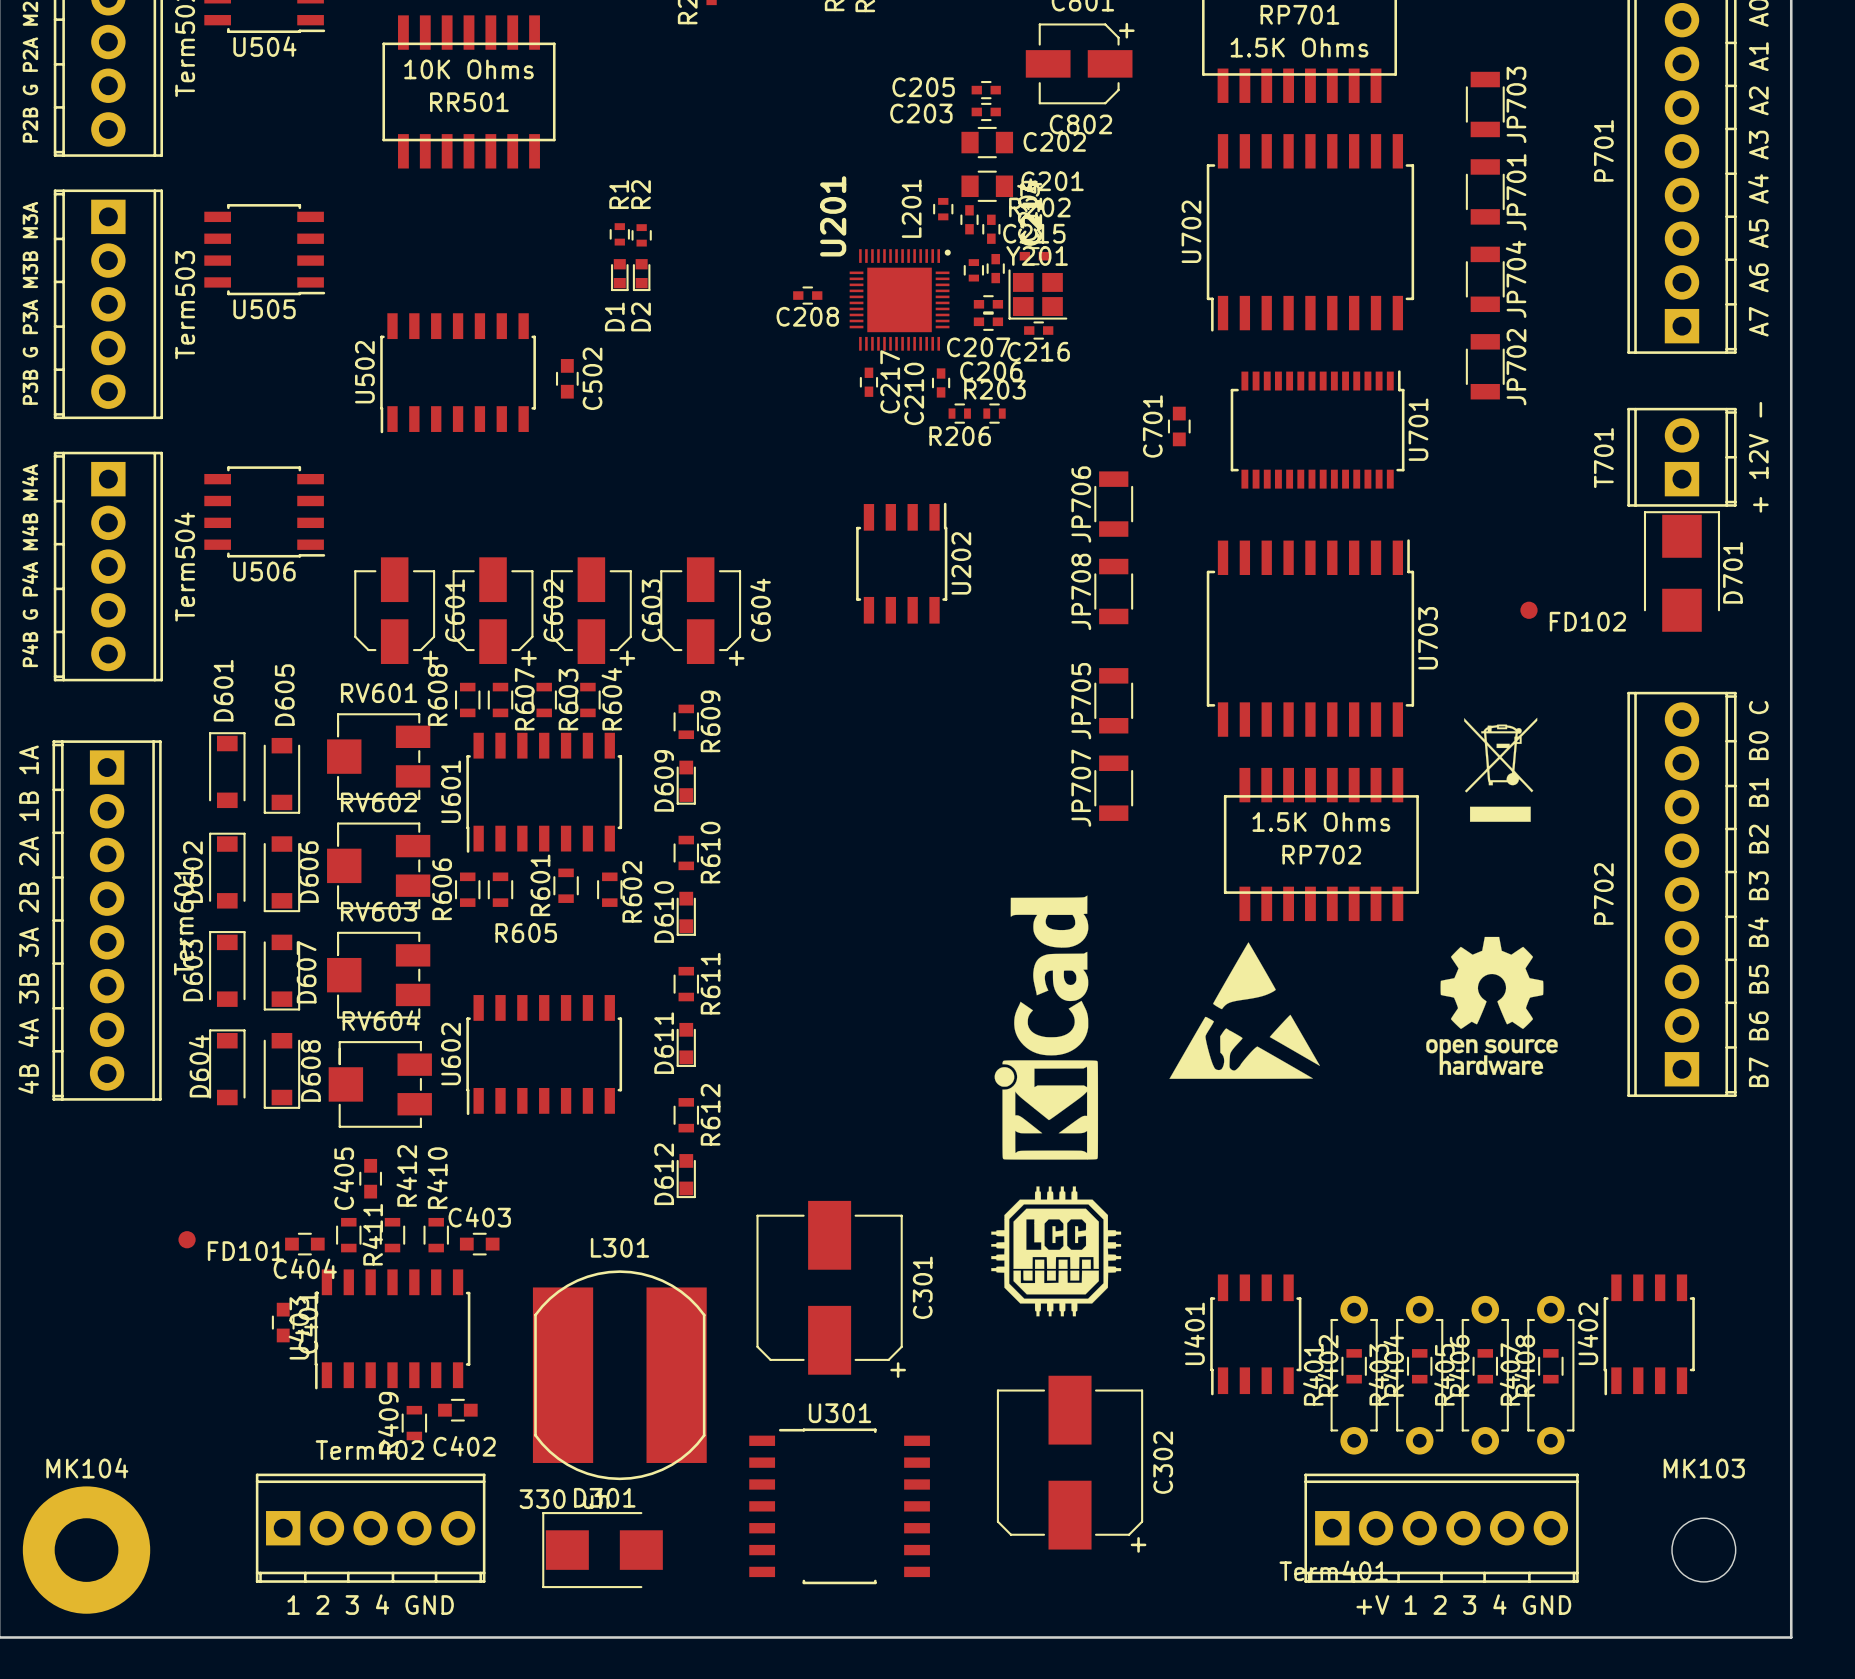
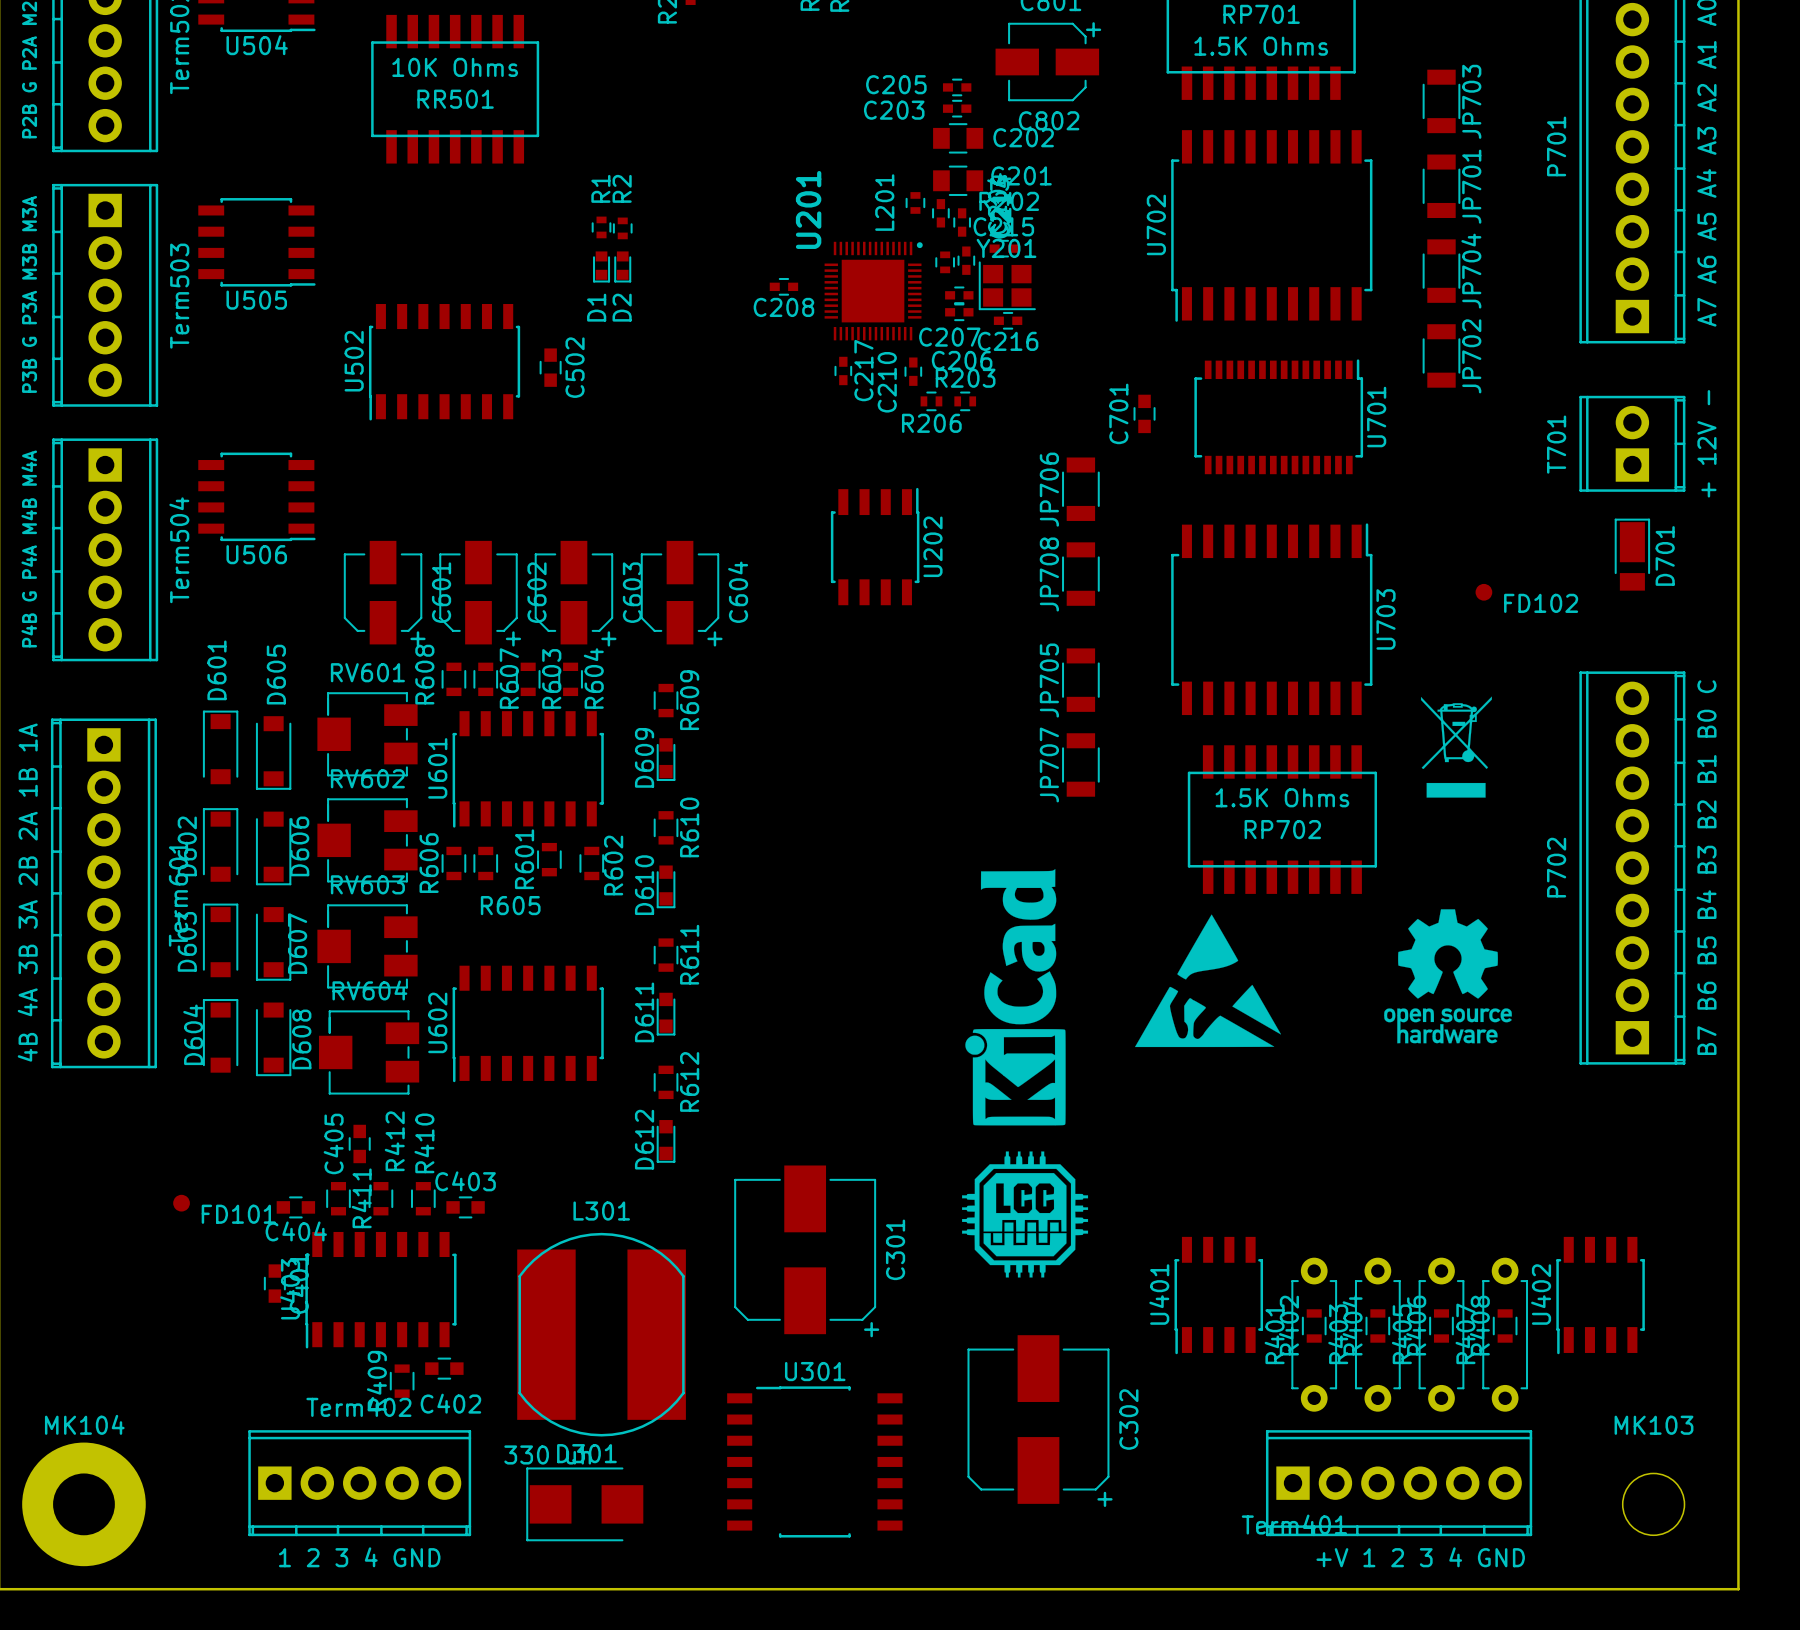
D701 footprint: [1643, 511, 1721, 632] -> [1614, 518, 1651, 591]

